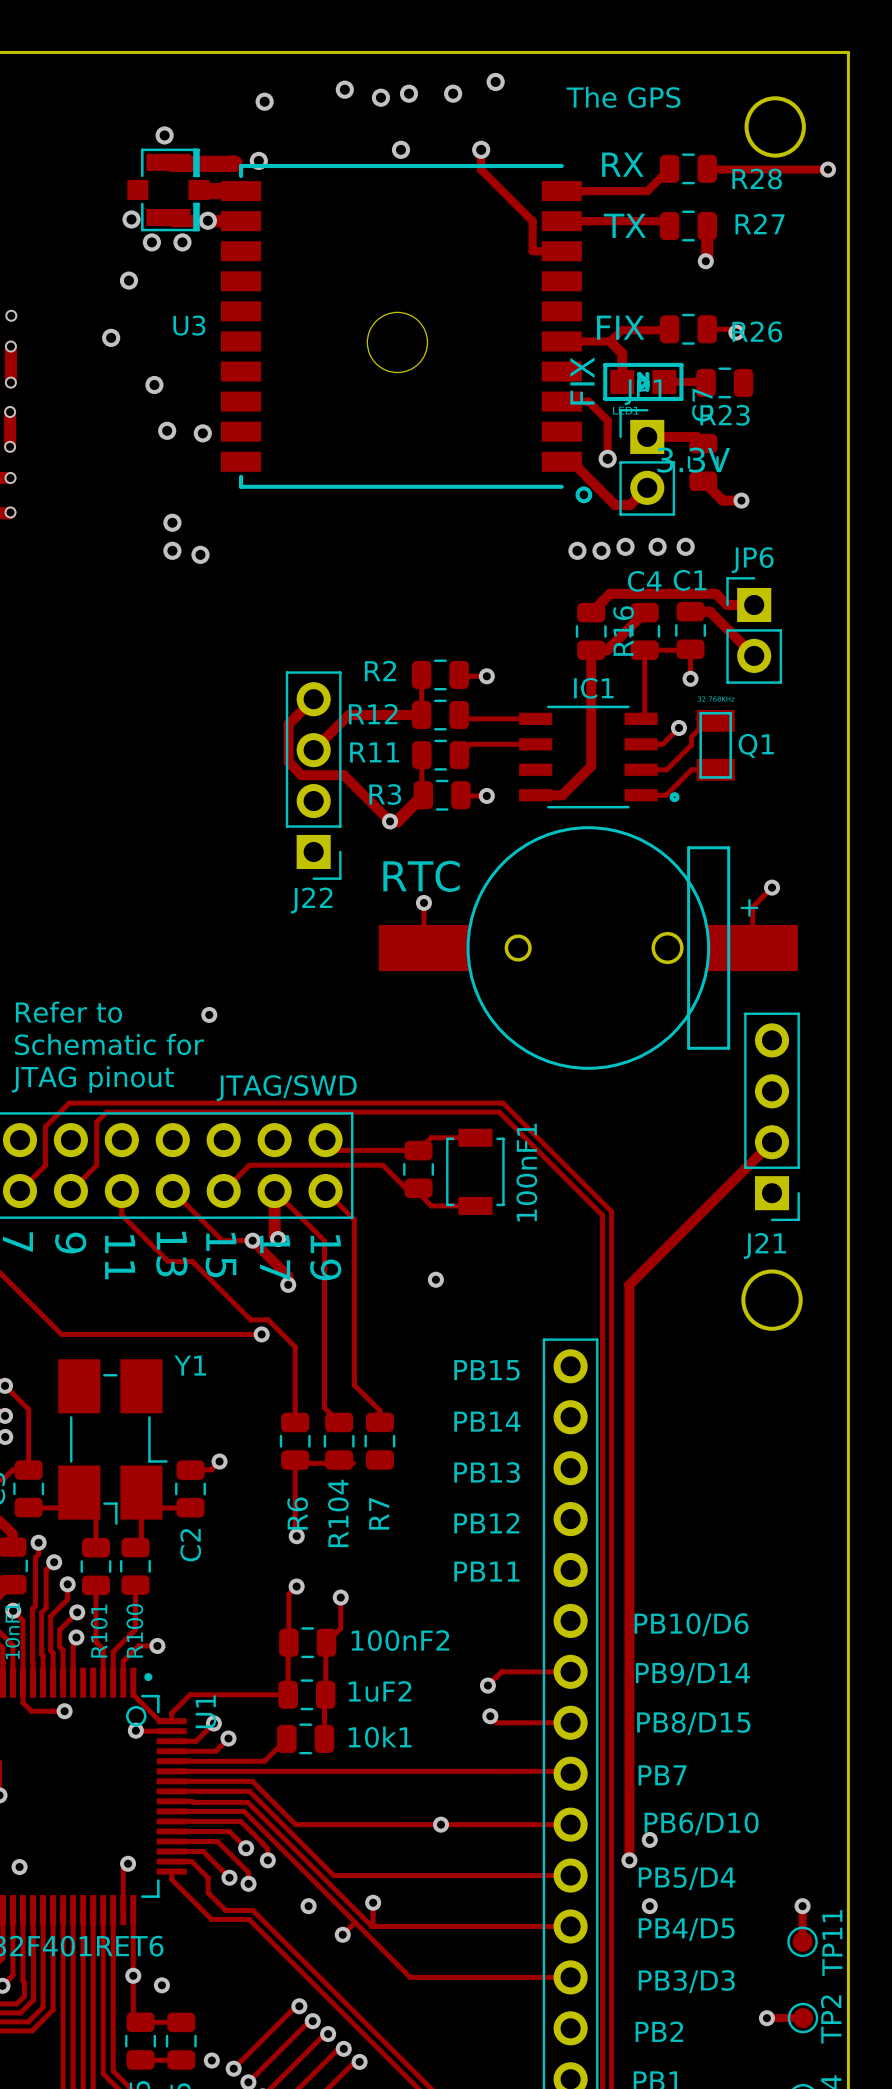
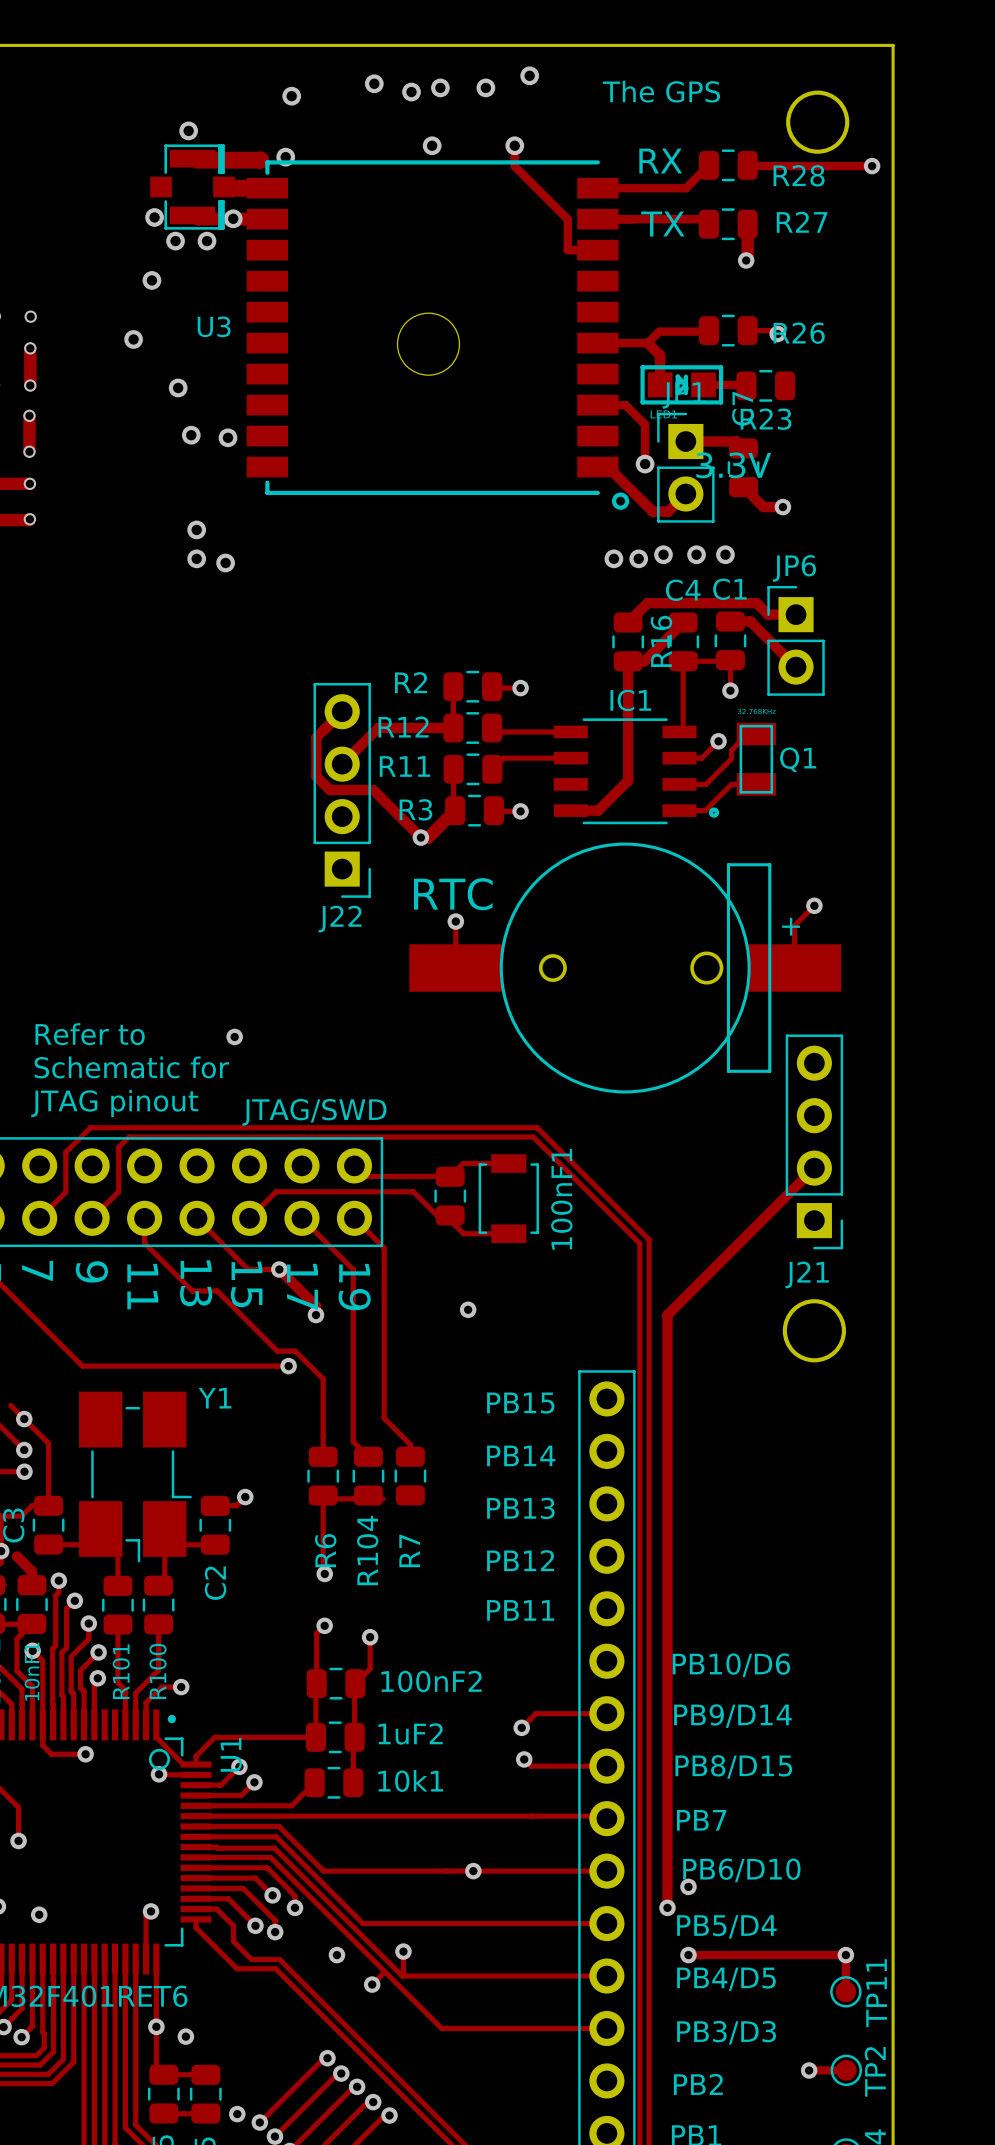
text: FIX (620, 327) -> none
text: FIX (582, 380) -> none
track: (274, 1191) (274, 1235) (278, 1239) -> none
via: (278, 1239) -> none
track: none -> (688, 1955) (845, 1955)

